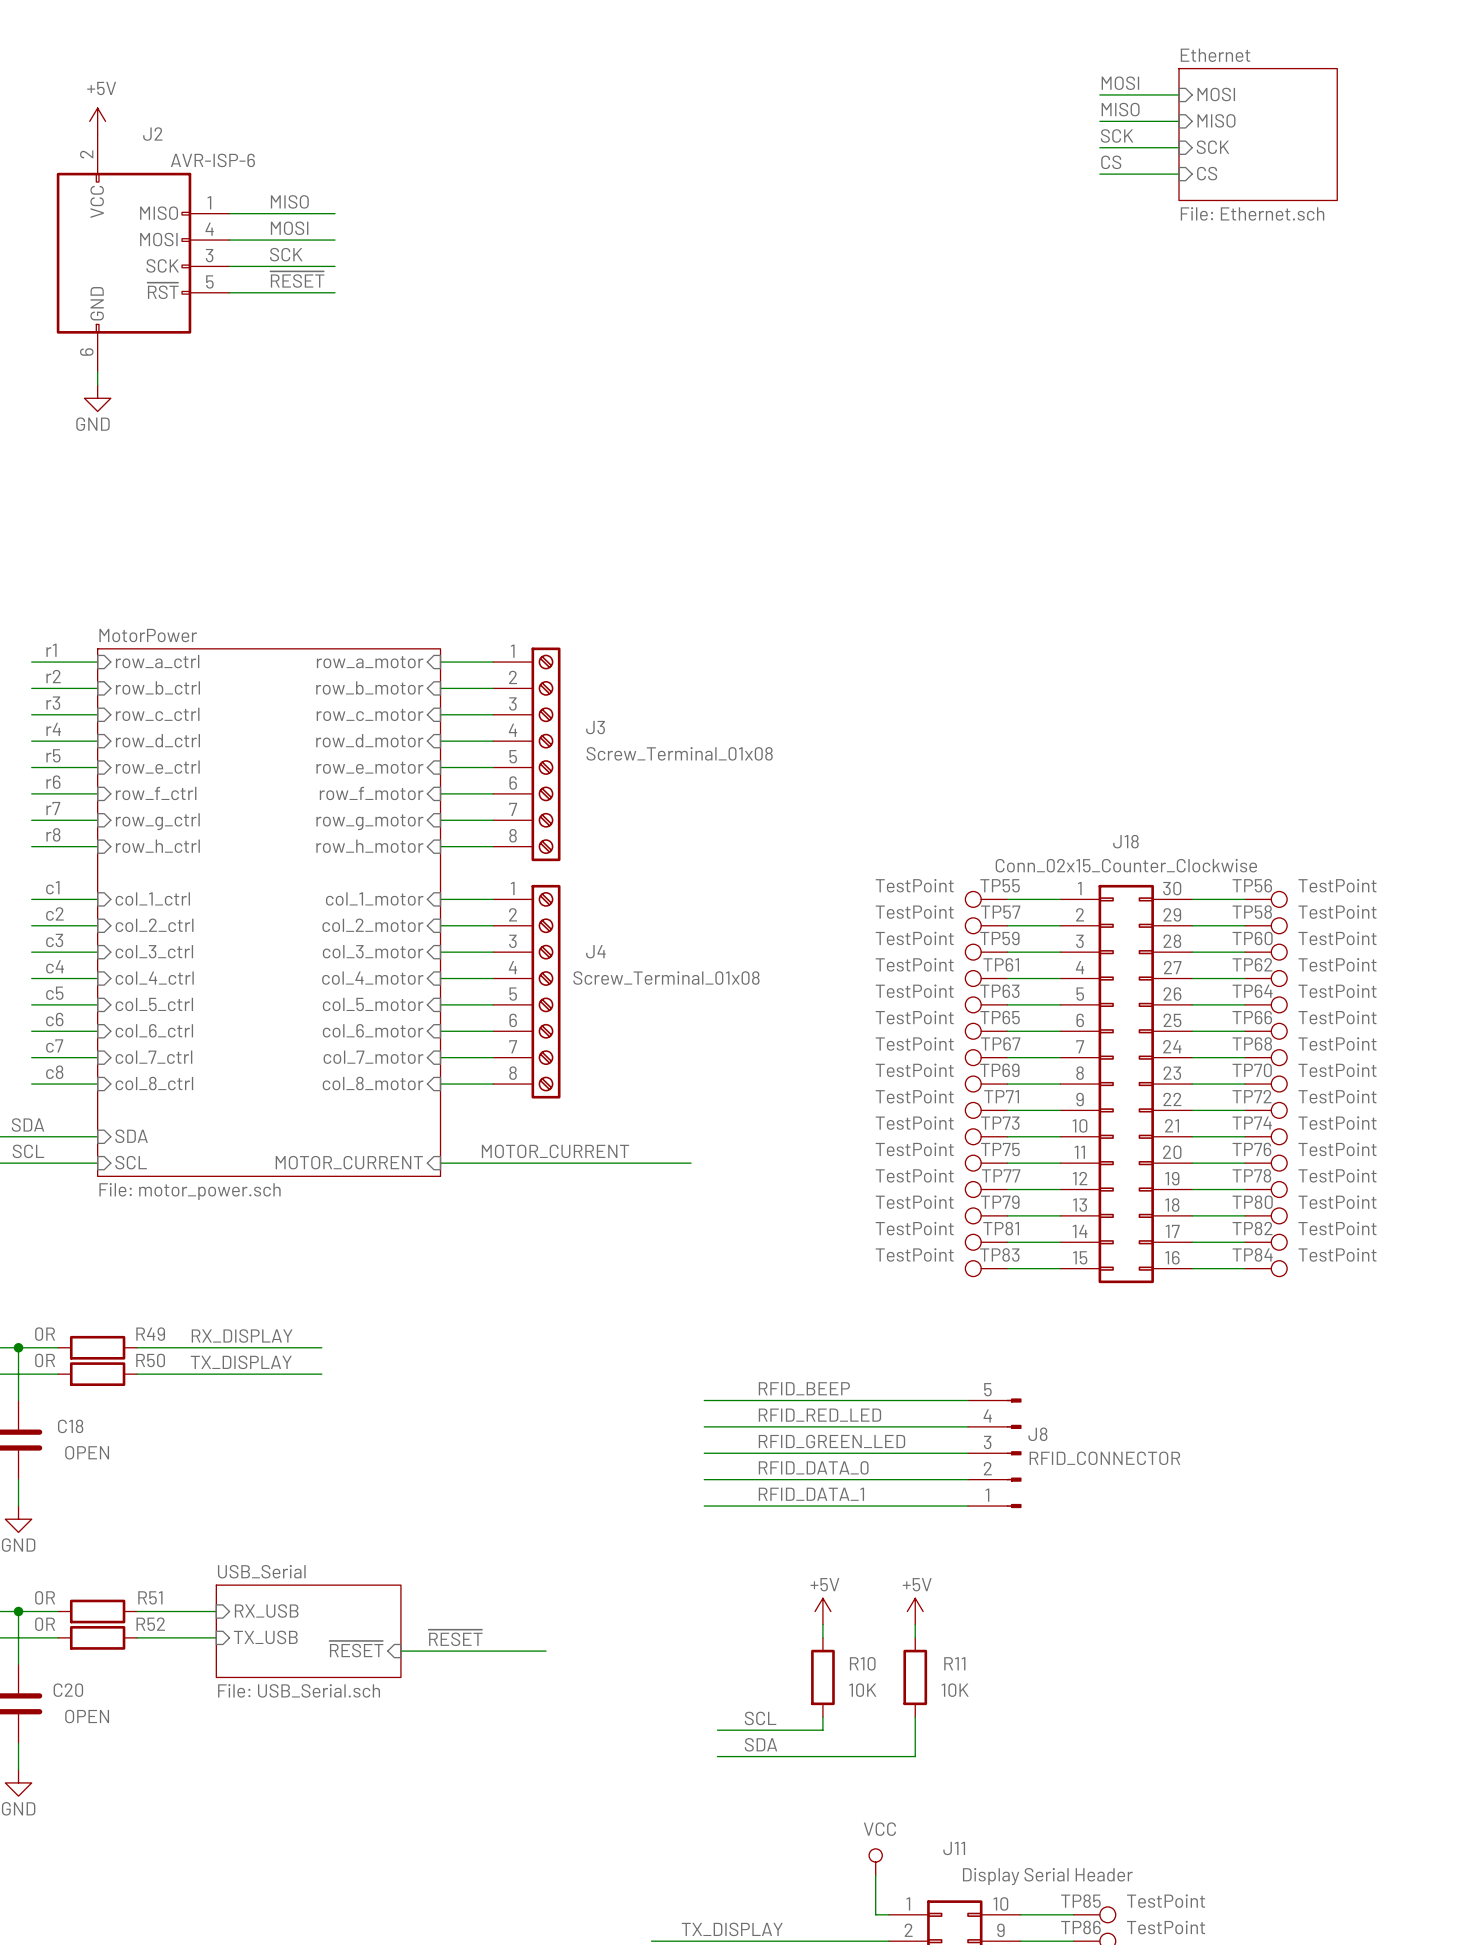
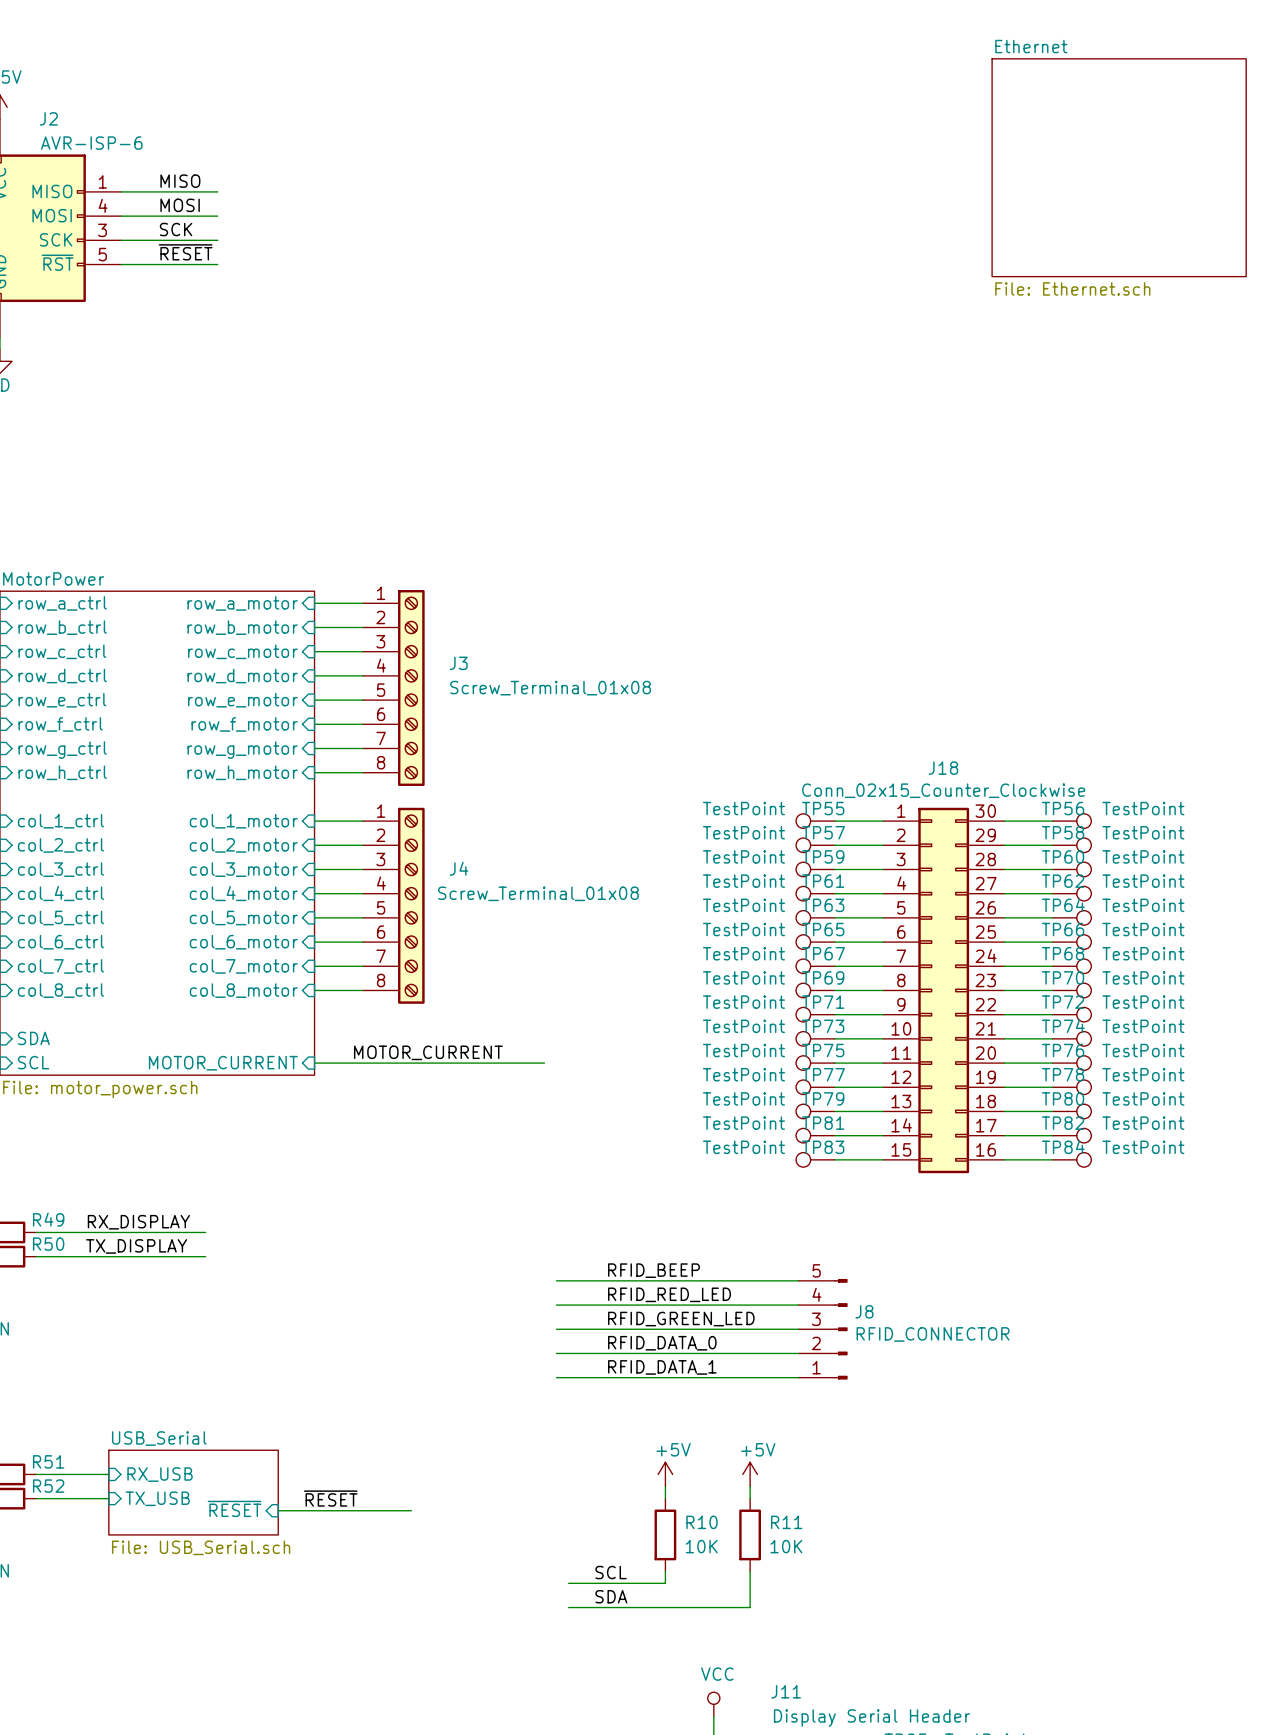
label: MOSI (1120, 83) -> none
wire: (1099, 94) (1179, 94) -> none
sheet pin: MOSI (1216, 94) -> none
label: MISO (1120, 109) -> none
sheet pin: MISO (1216, 120) -> none
wire: (1099, 121) (1179, 121) -> none
sheet Ethernet: File: Ethernet.sch (1258, 134) -> none
label: SCK (1117, 135) -> none
wire: (1099, 147) (1179, 147) -> none
sheet pin: SCK (1212, 147) -> none
label: CS (1111, 162) -> none
sheet pin: CS (1207, 173) -> none
wire: (1099, 174) (1179, 174) -> none
sheet Ethernet: none -> File: Ethernet.sch (1119, 167)

